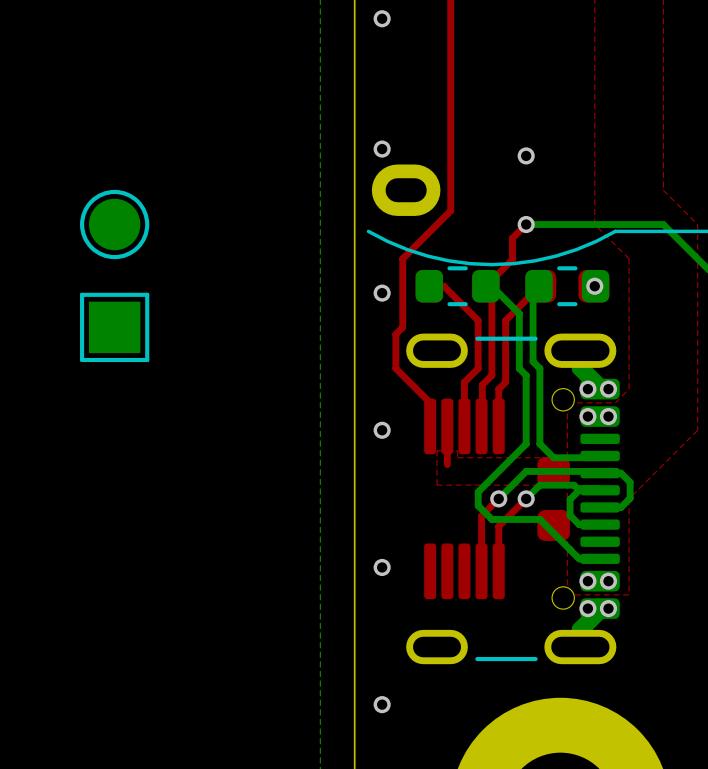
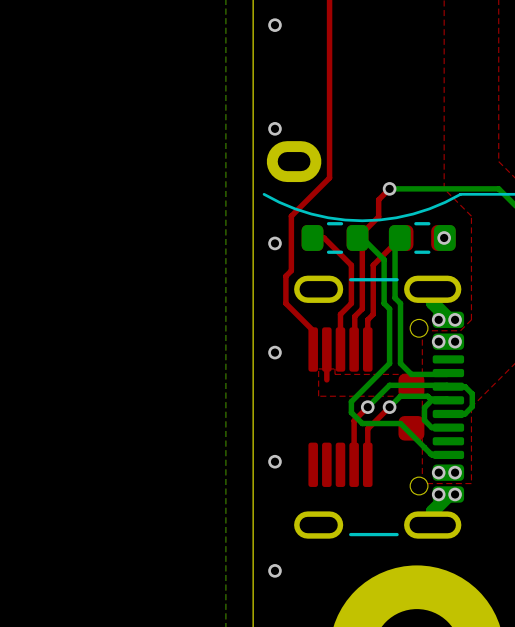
via: (526, 155) -> none
part: (114, 224) -> none
part: (114, 327) -> none

